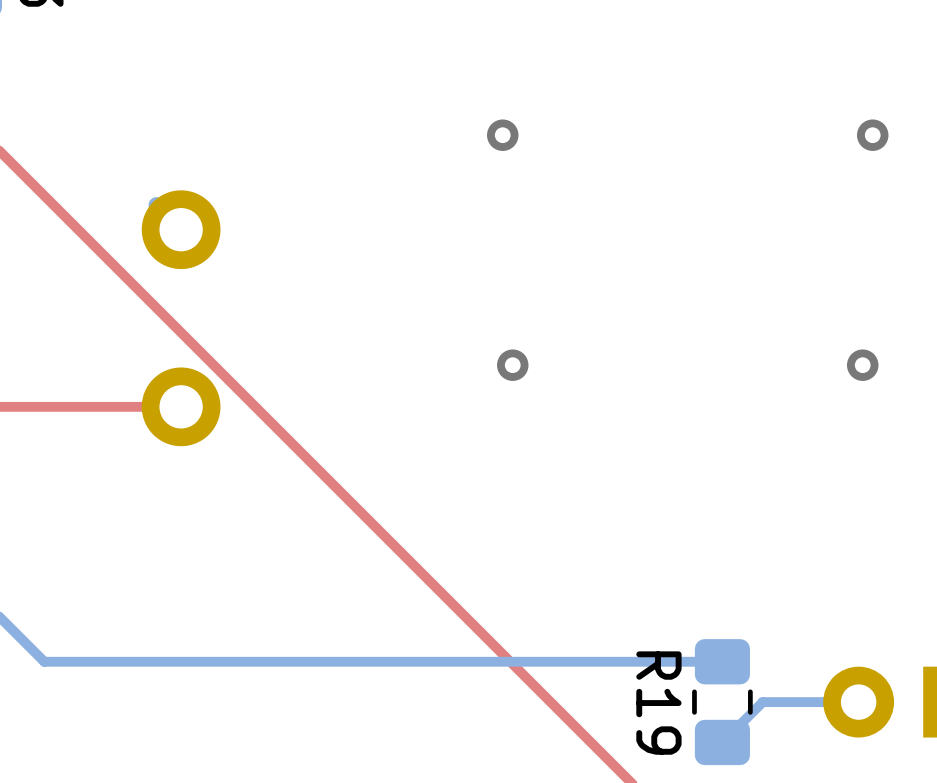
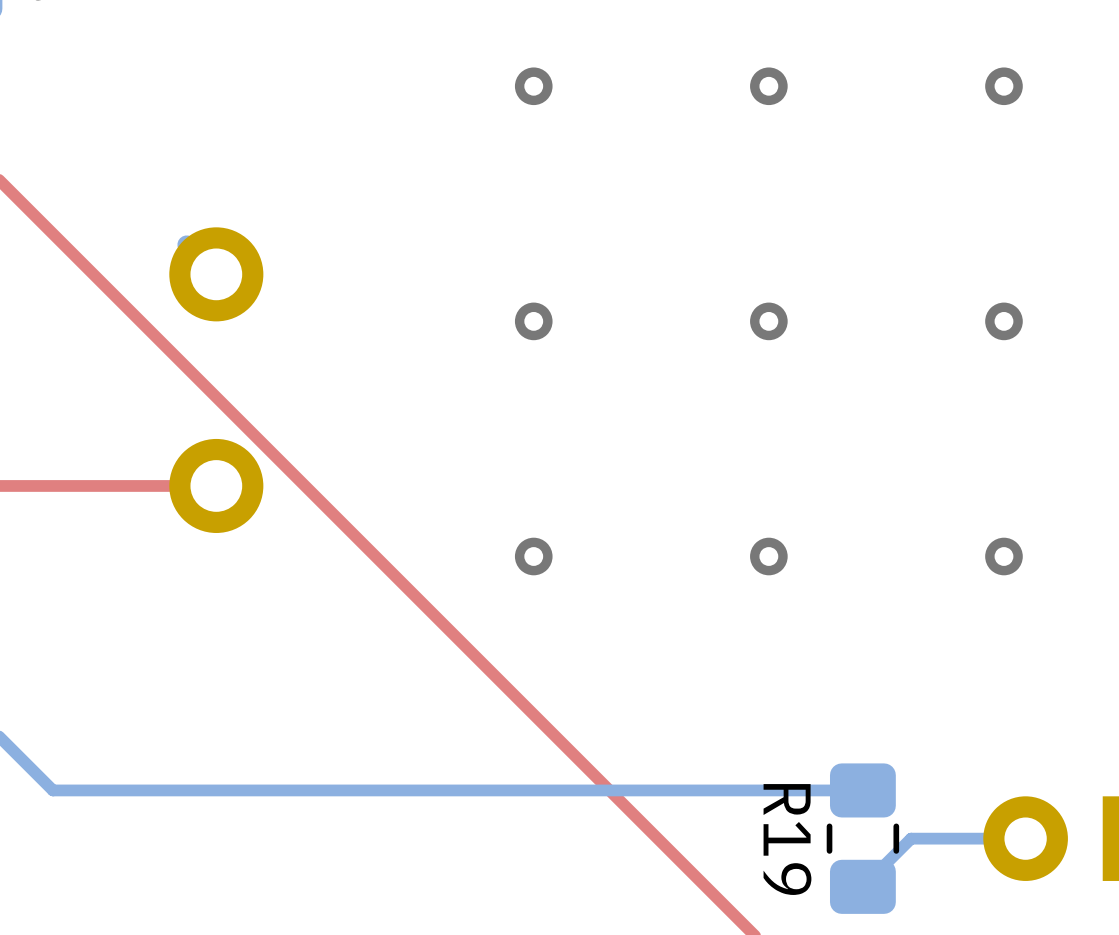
via: none -> (533, 86)
via: none -> (768, 86)
via: none -> (1003, 86)
via: (502, 135) -> none
via: (872, 135) -> none
via: none -> (533, 321)
via: none -> (768, 321)
via: none -> (1003, 321)
via: (512, 365) -> none
via: (862, 365) -> none
via: none -> (533, 556)
via: none -> (768, 556)
via: none -> (1003, 556)

